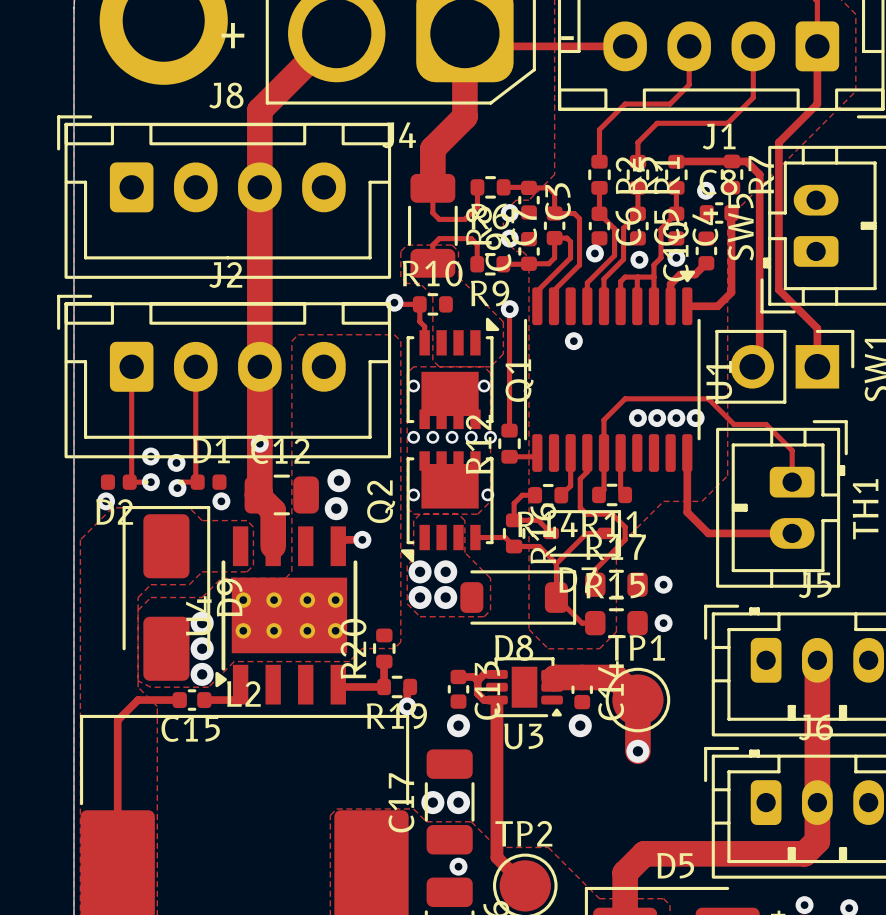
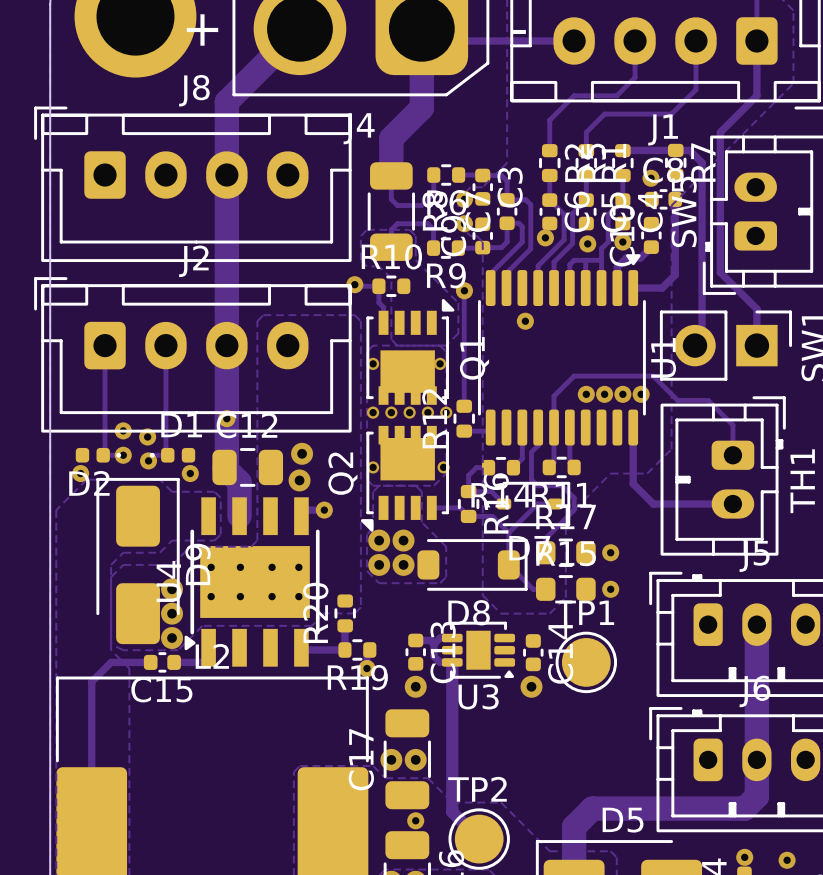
track: (554, 678) (615, 677) (637, 700) (637, 751) -> none
via: (637, 751) -> none

